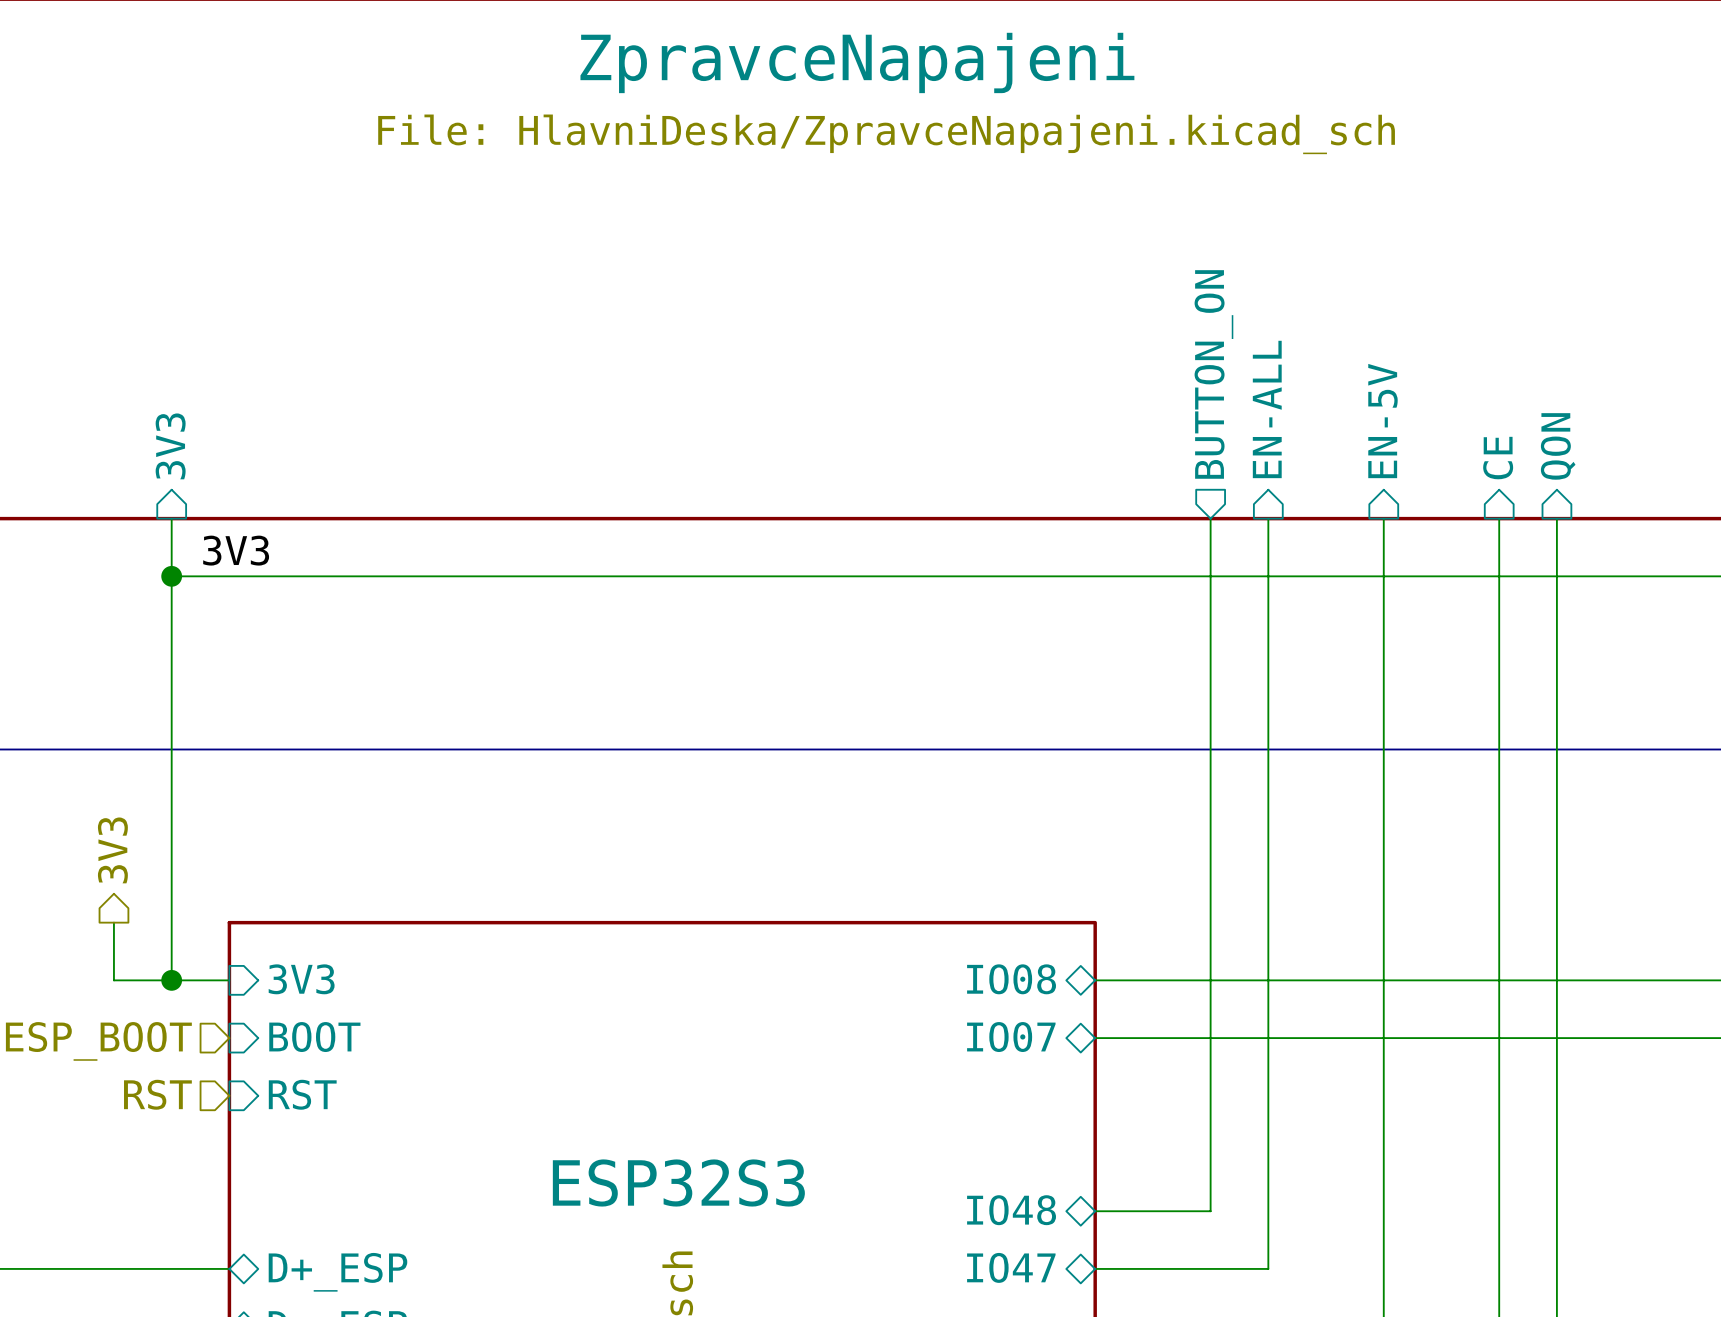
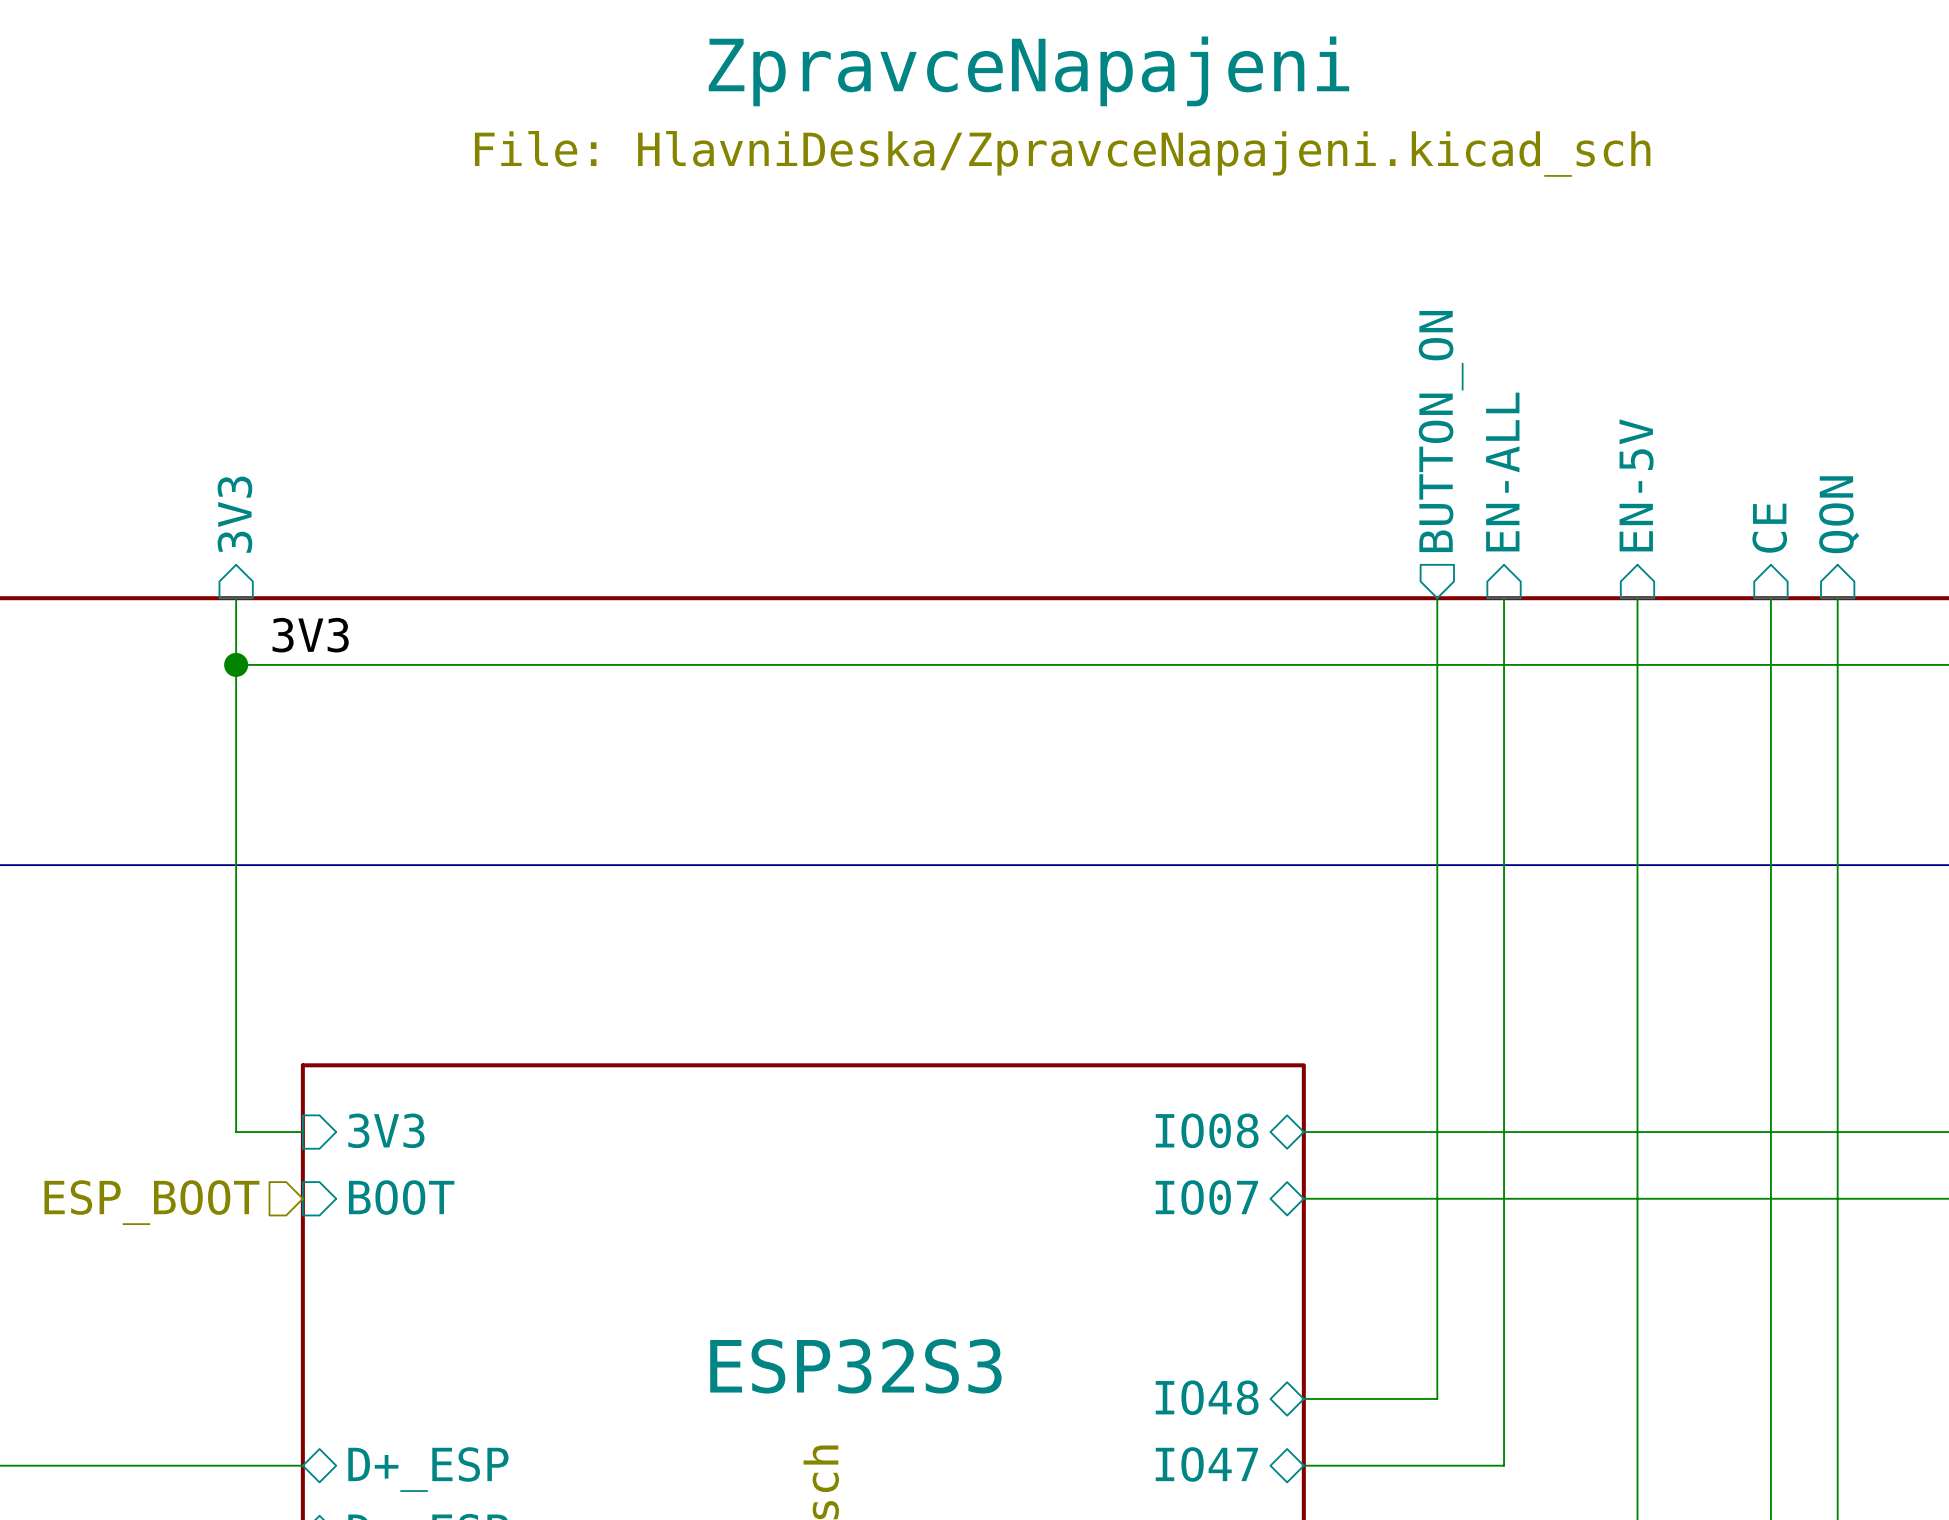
hierarchical label: 3V3 (112, 850) -> none
wire: (113, 922) (113, 980) (171, 980) -> none
junction: (171, 980) -> none
hierarchical label: RST (157, 1094) -> none
sheet pin: RST (302, 1094) -> none
sheet ESP32S3 name position: ESP32S3 (678, 1182) -> ESP32S3 (855, 1366)

